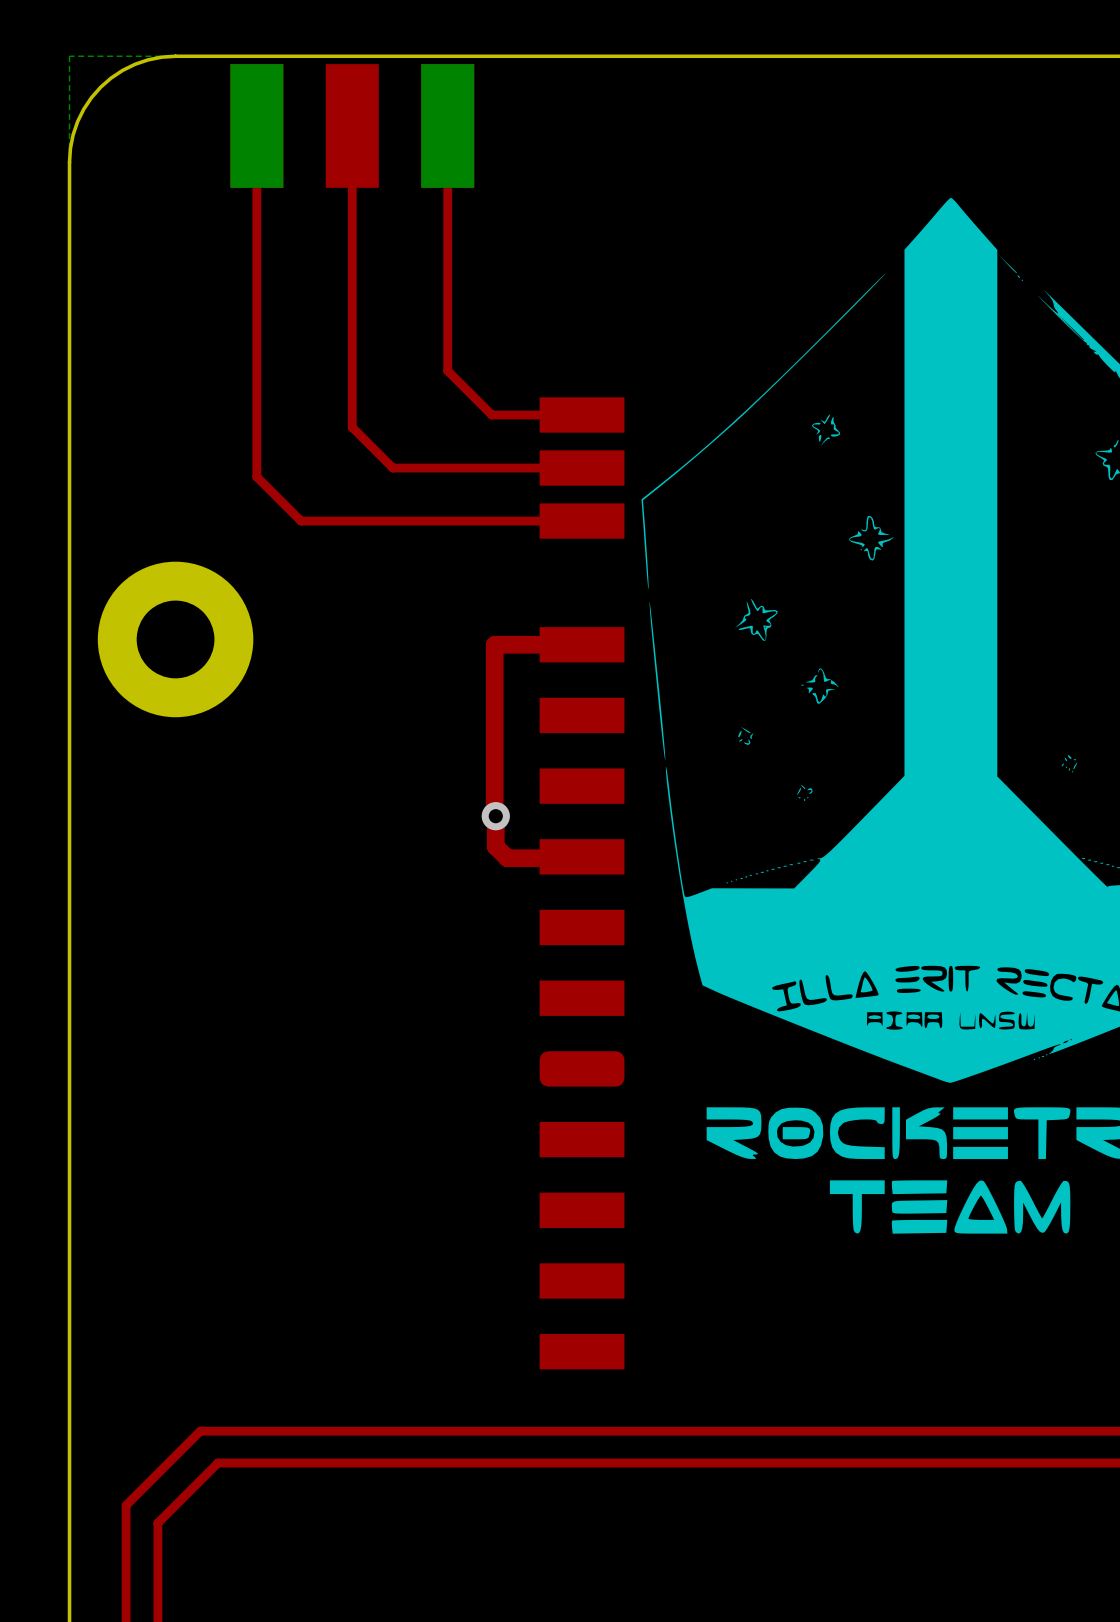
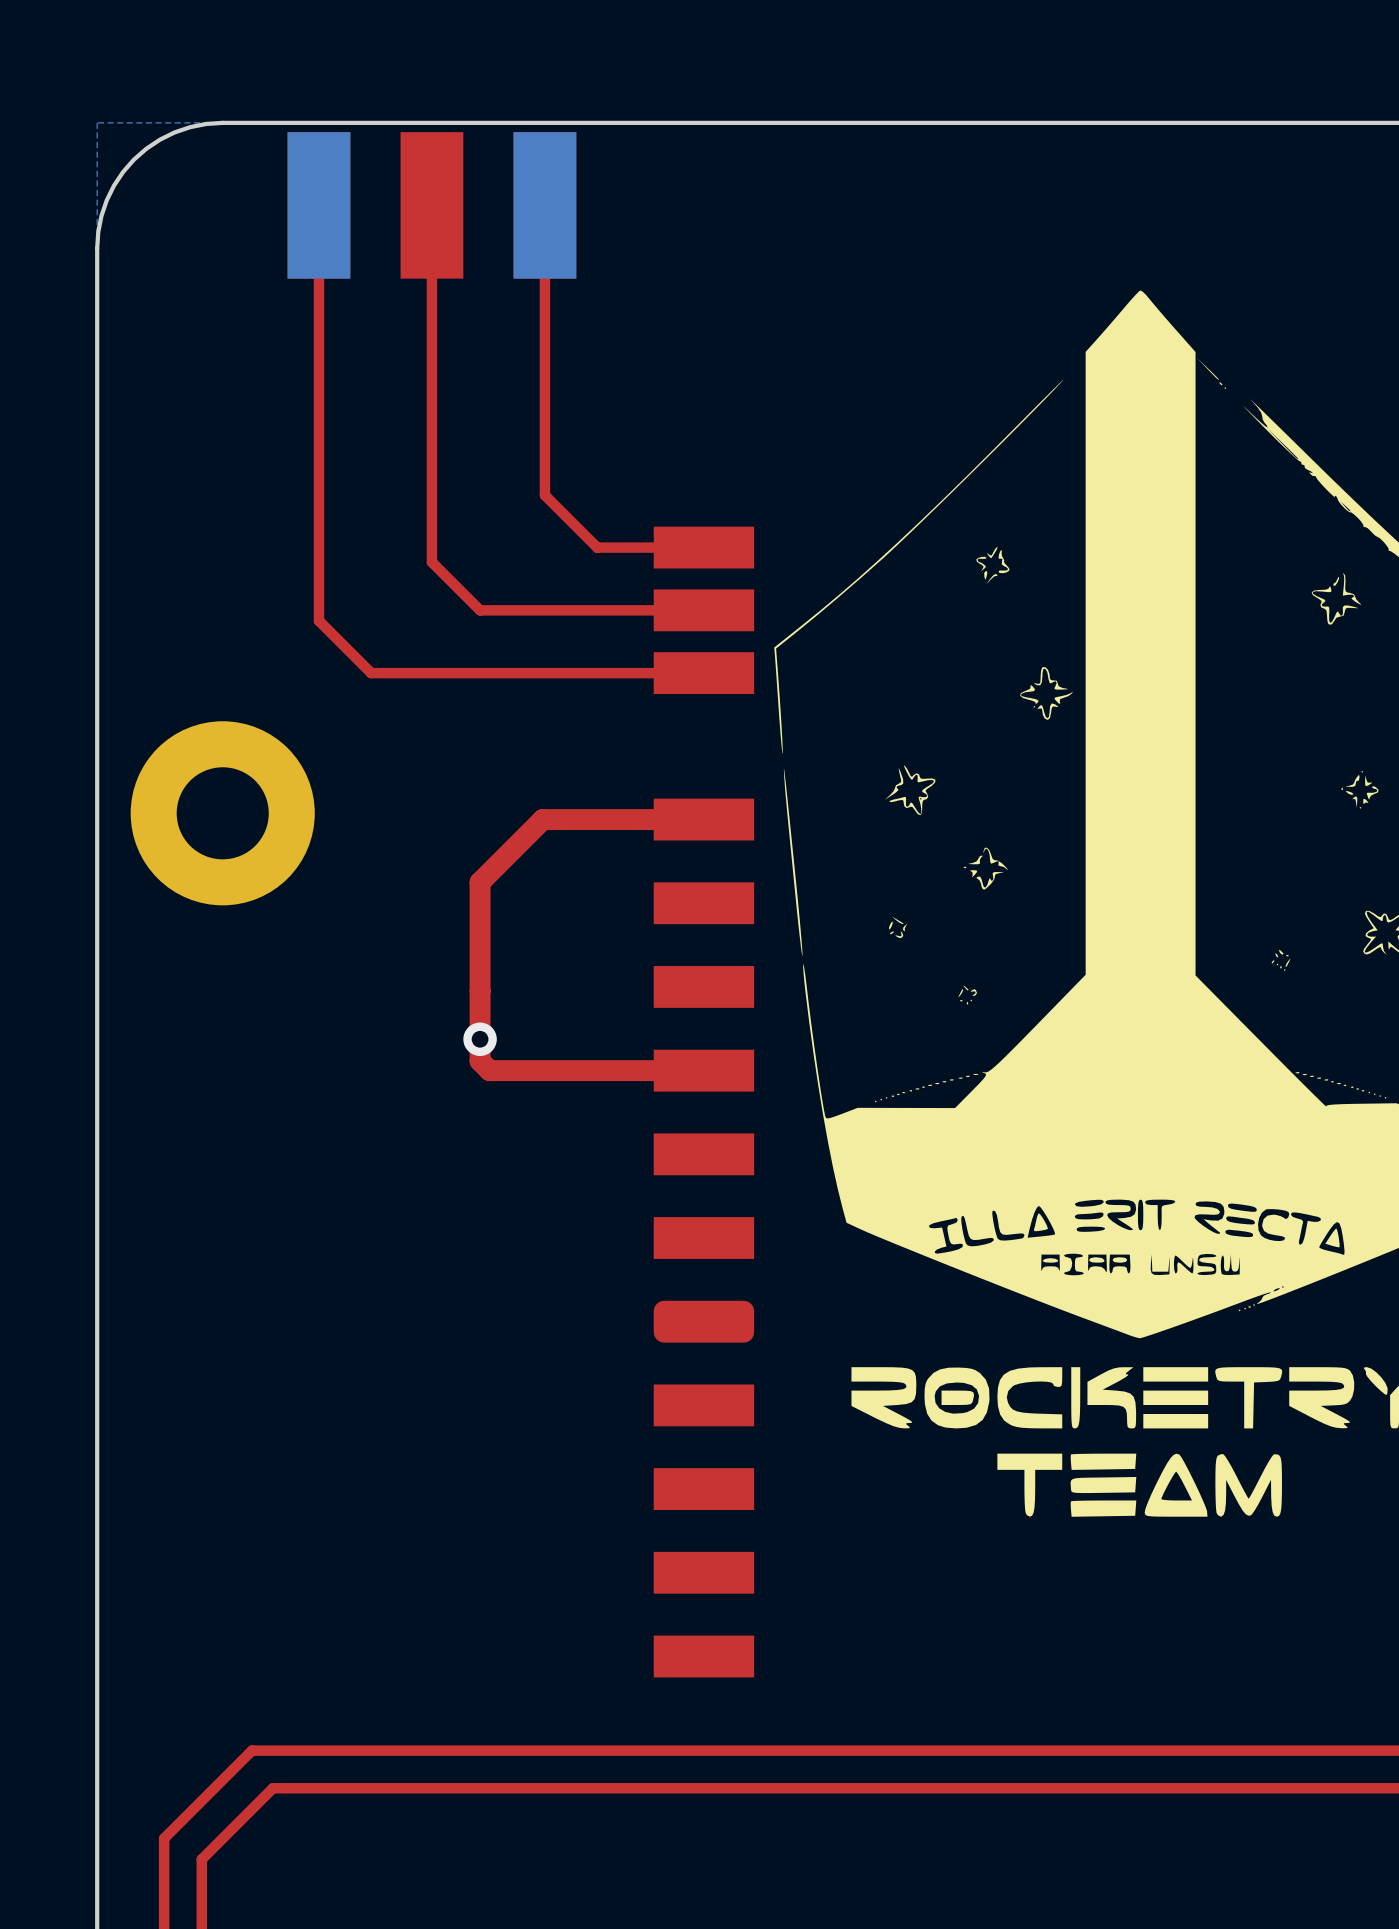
top track: (494, 645) (495, 846) (507, 858) (582, 856) -> (601, 819) (542, 819) (480, 882) (480, 1061) (489, 1070) (703, 1070)
via position: (495, 816) -> (480, 1039)

